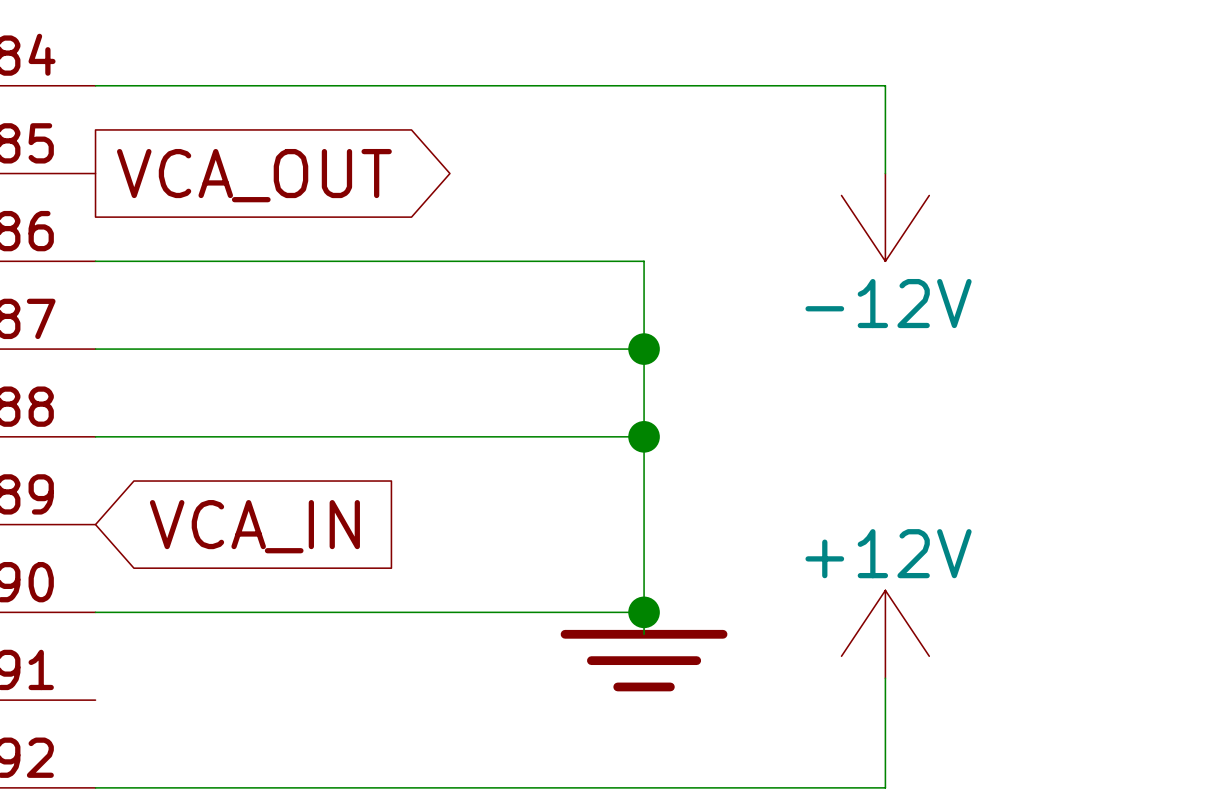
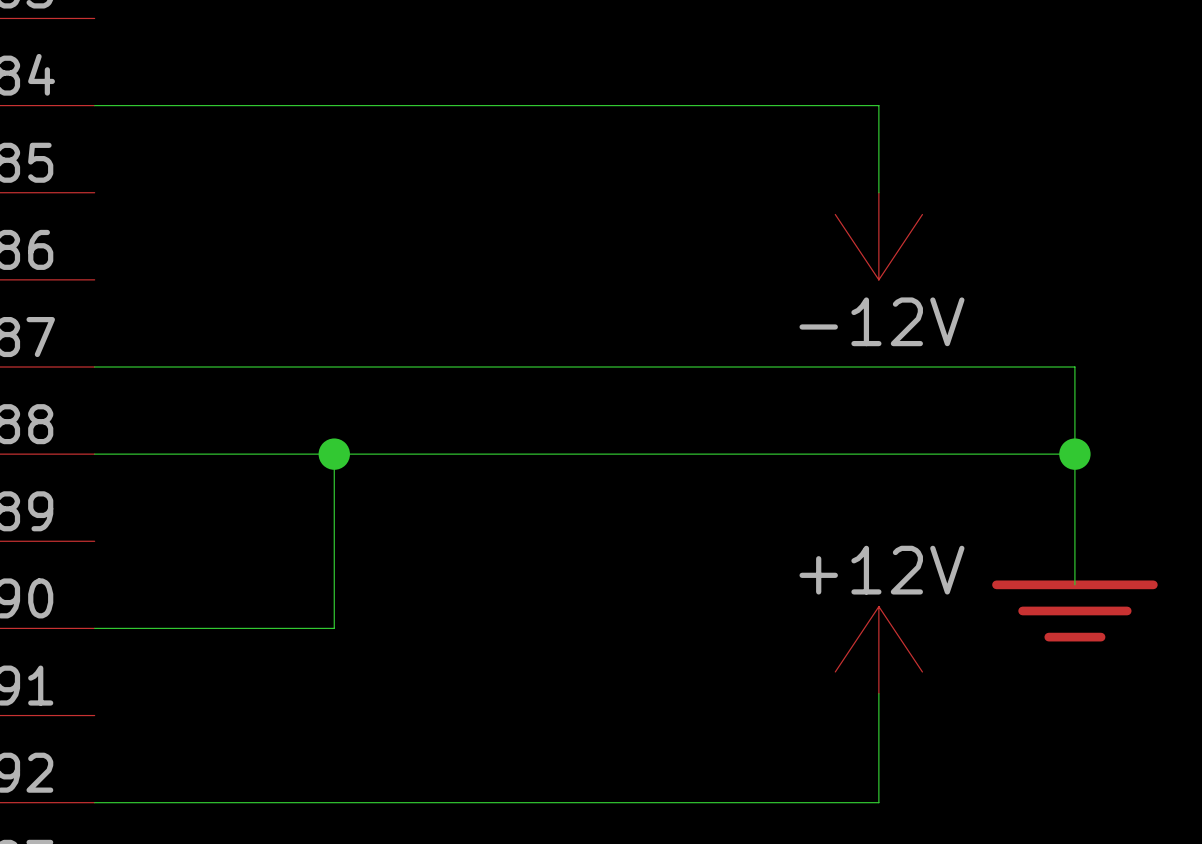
global label: VCA_OUT (254, 175) -> none
wire: (95, 261) (644, 261) (644, 634) -> none
wire: none -> (639, 367) (1074, 367) (1074, 584)
junction: (644, 349) -> none
junction: none -> (334, 454)
wire: none -> (639, 454) (1074, 454)
junction: (644, 436) -> none
junction: none -> (1074, 454)
global label: VCA_IN (254, 526) -> none
wire: (336, 612) (644, 612) -> (334, 628) (334, 454)
junction: (644, 612) -> none
power symbol position: (644, 660) -> (1074, 610)

